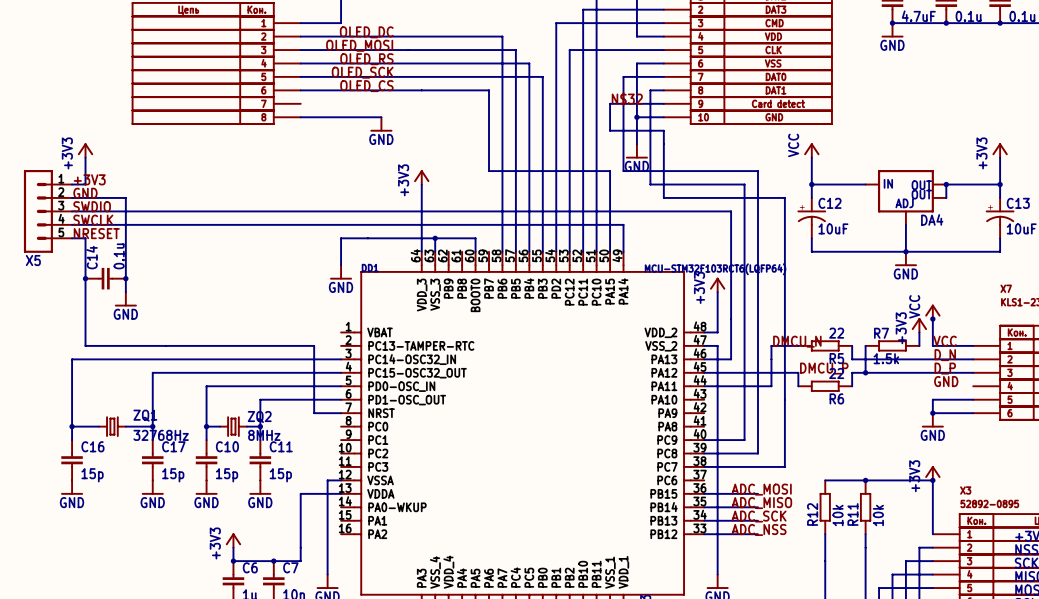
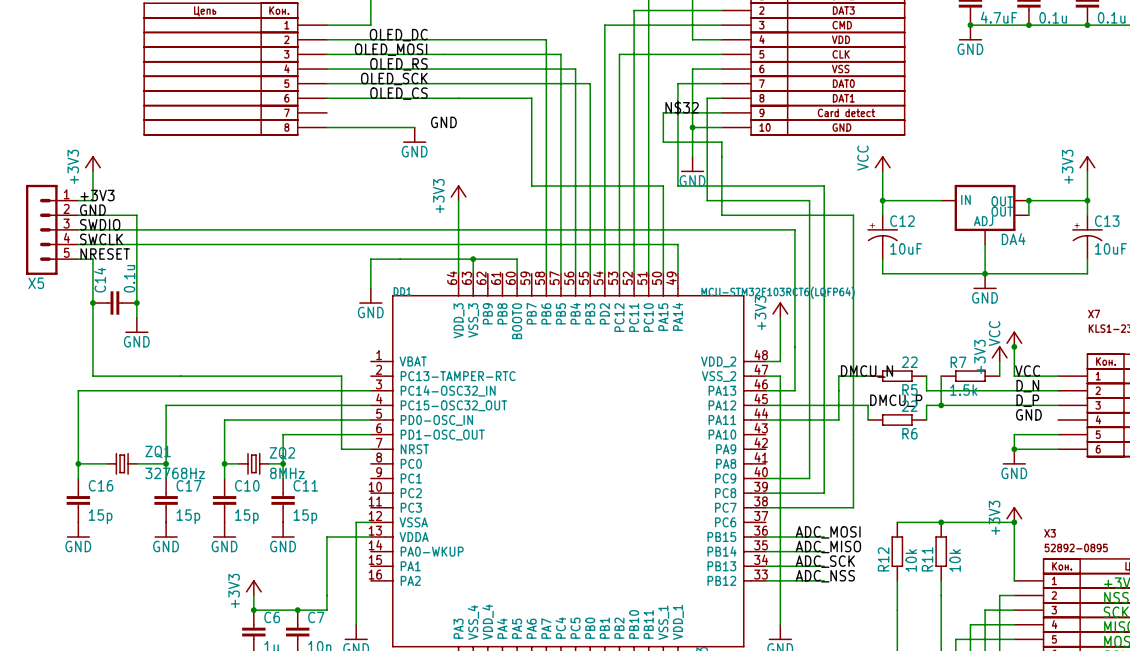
label: none -> GND (443, 122)

